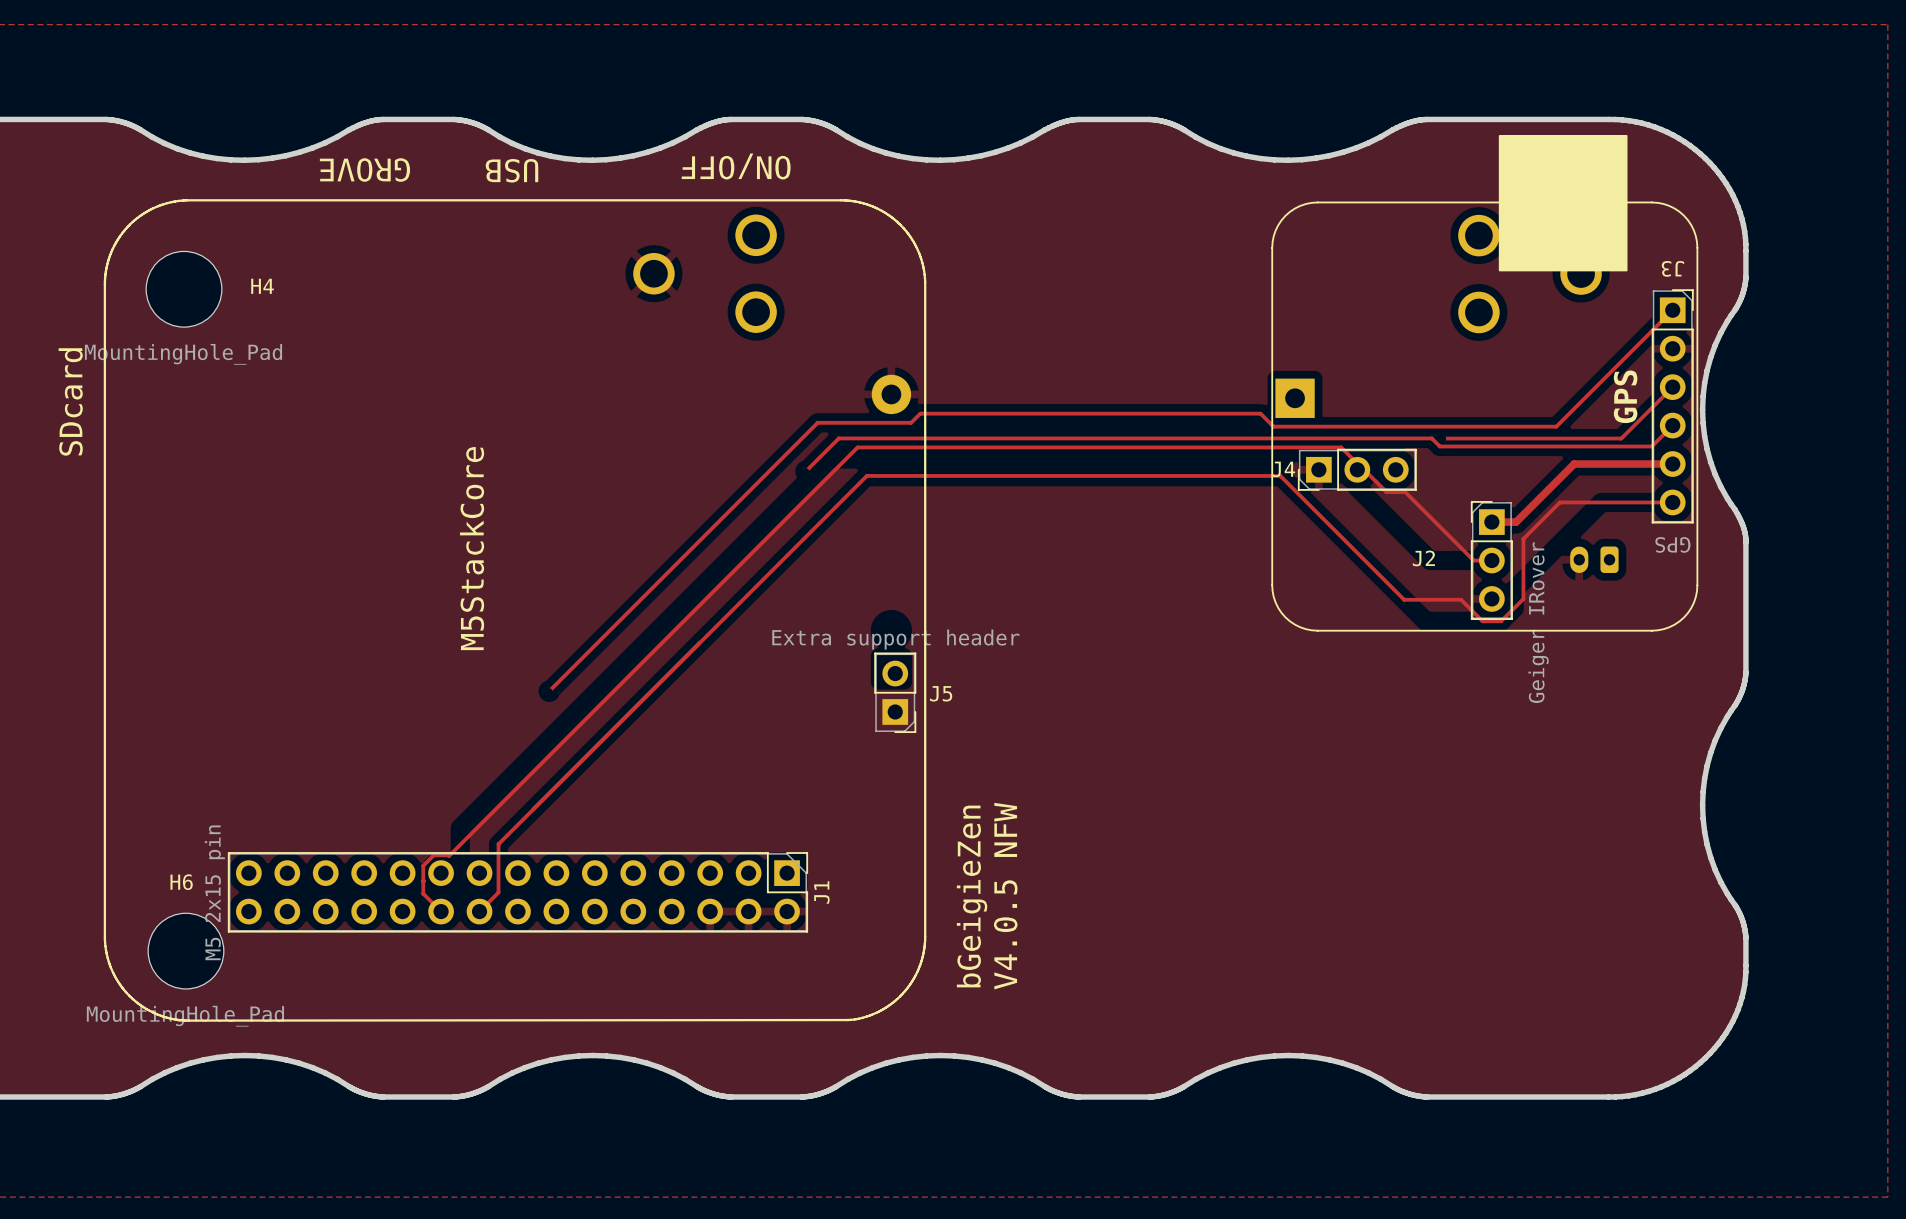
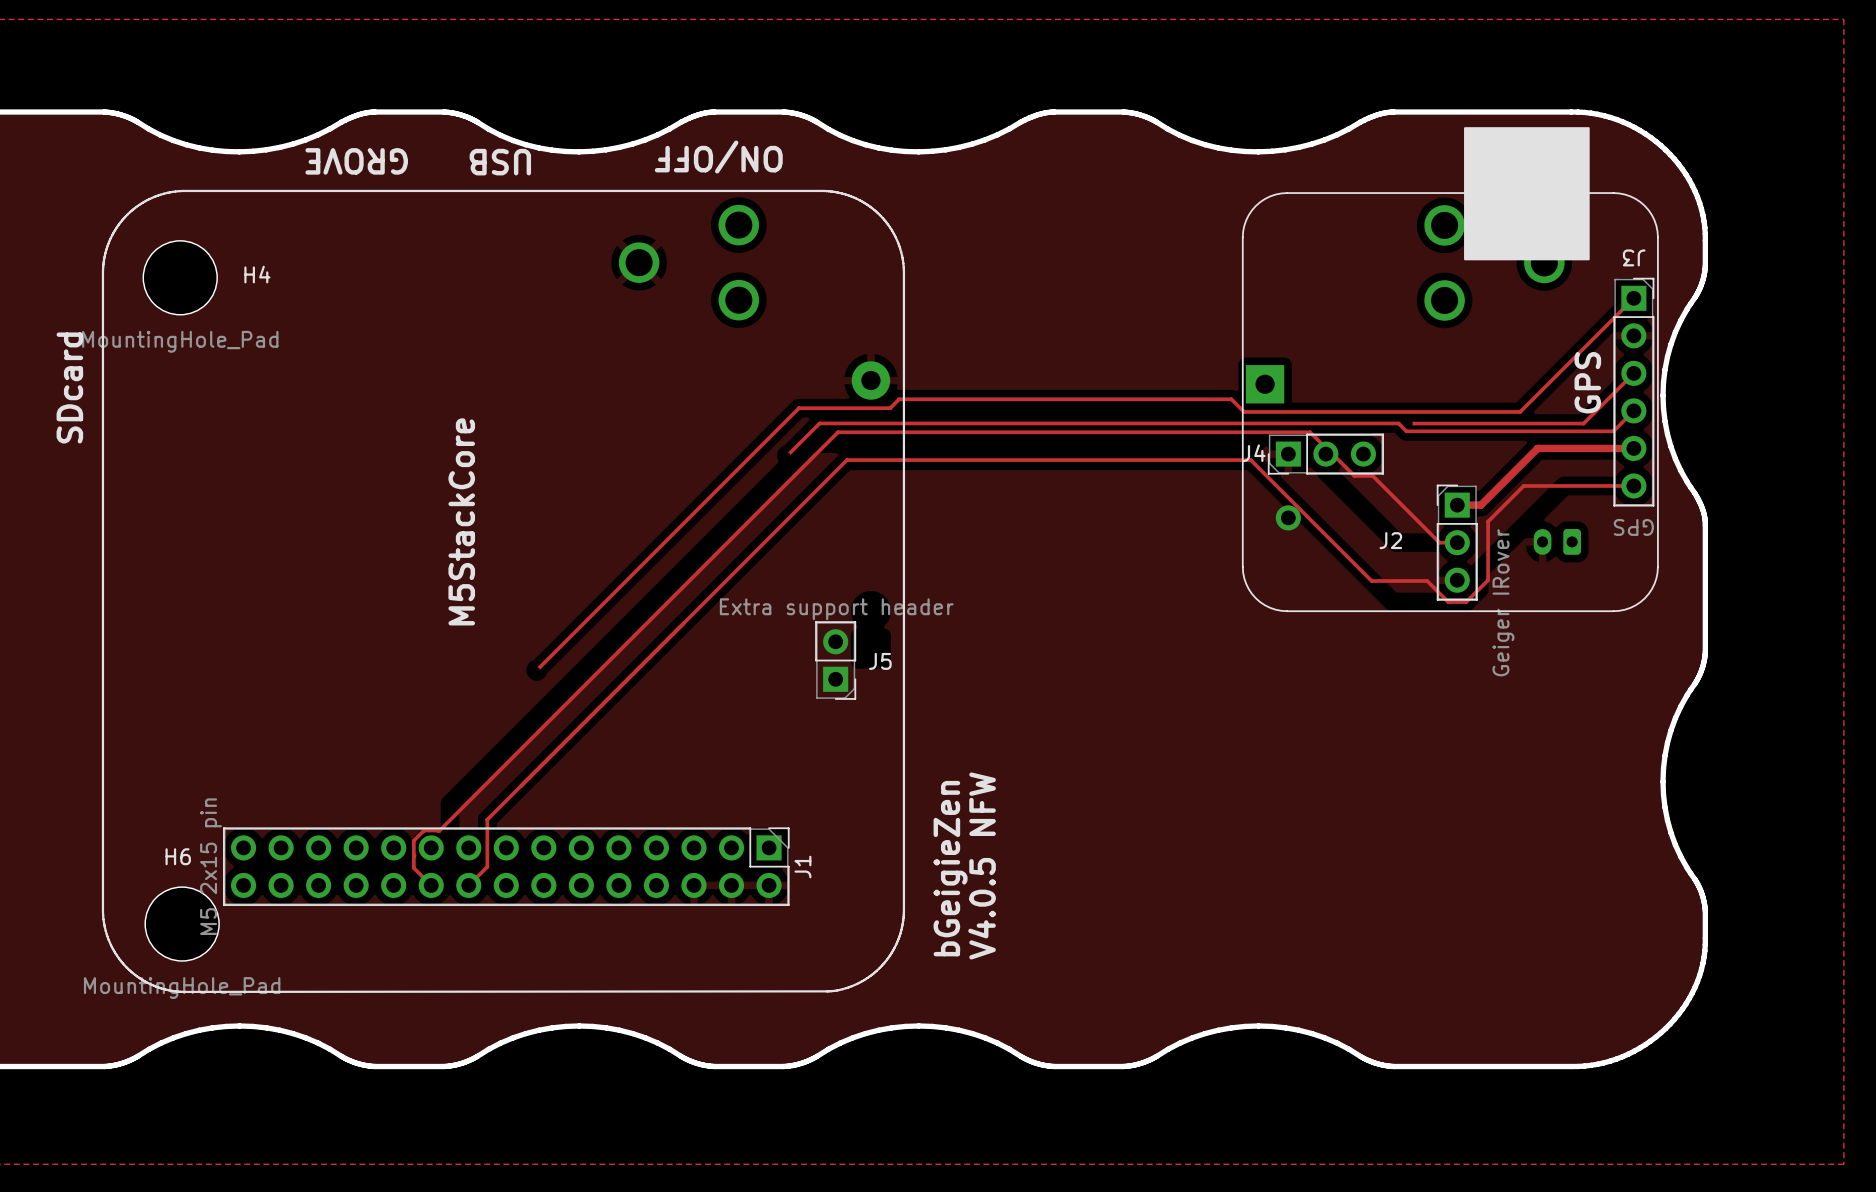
part: none -> (1288, 517)
J5 position: (895, 692) -> (835, 660)

